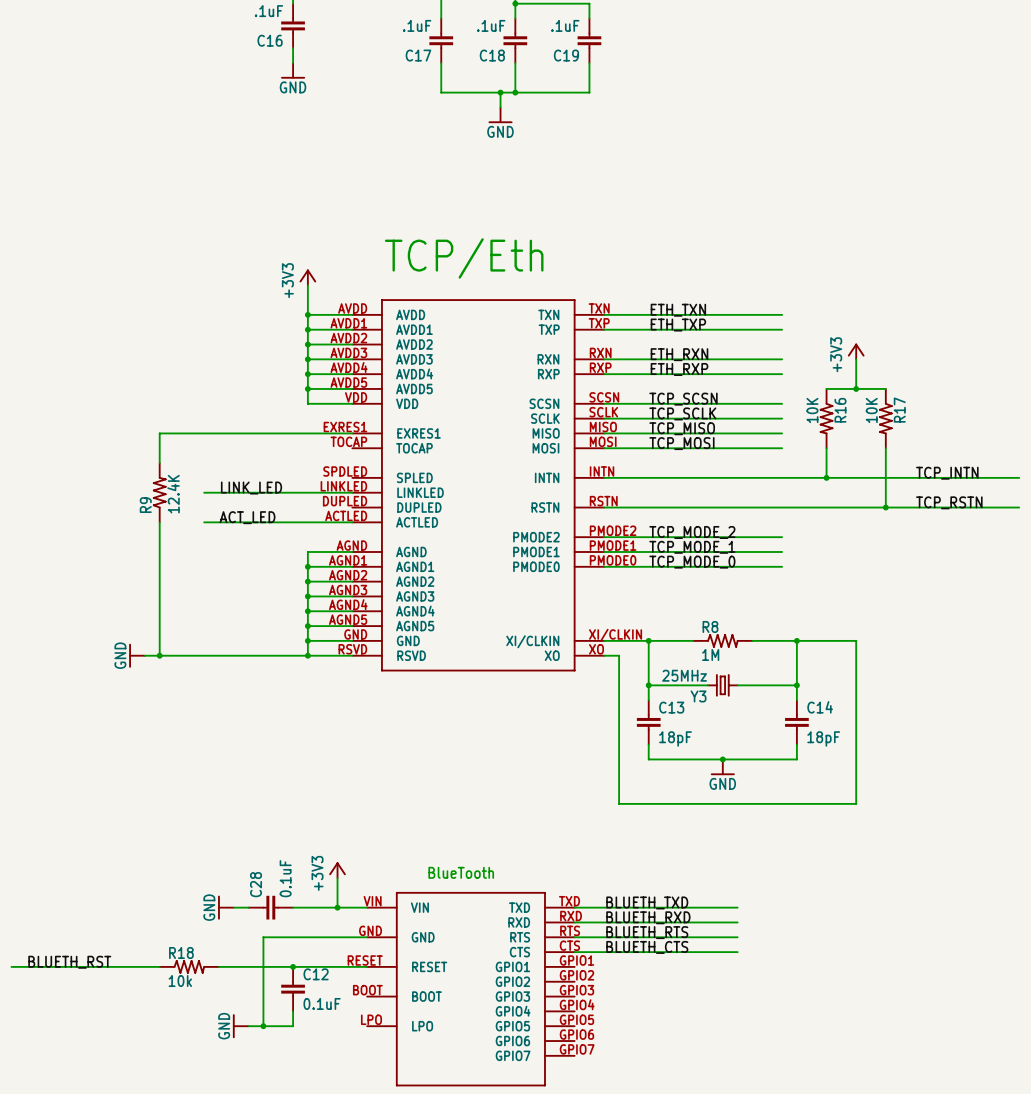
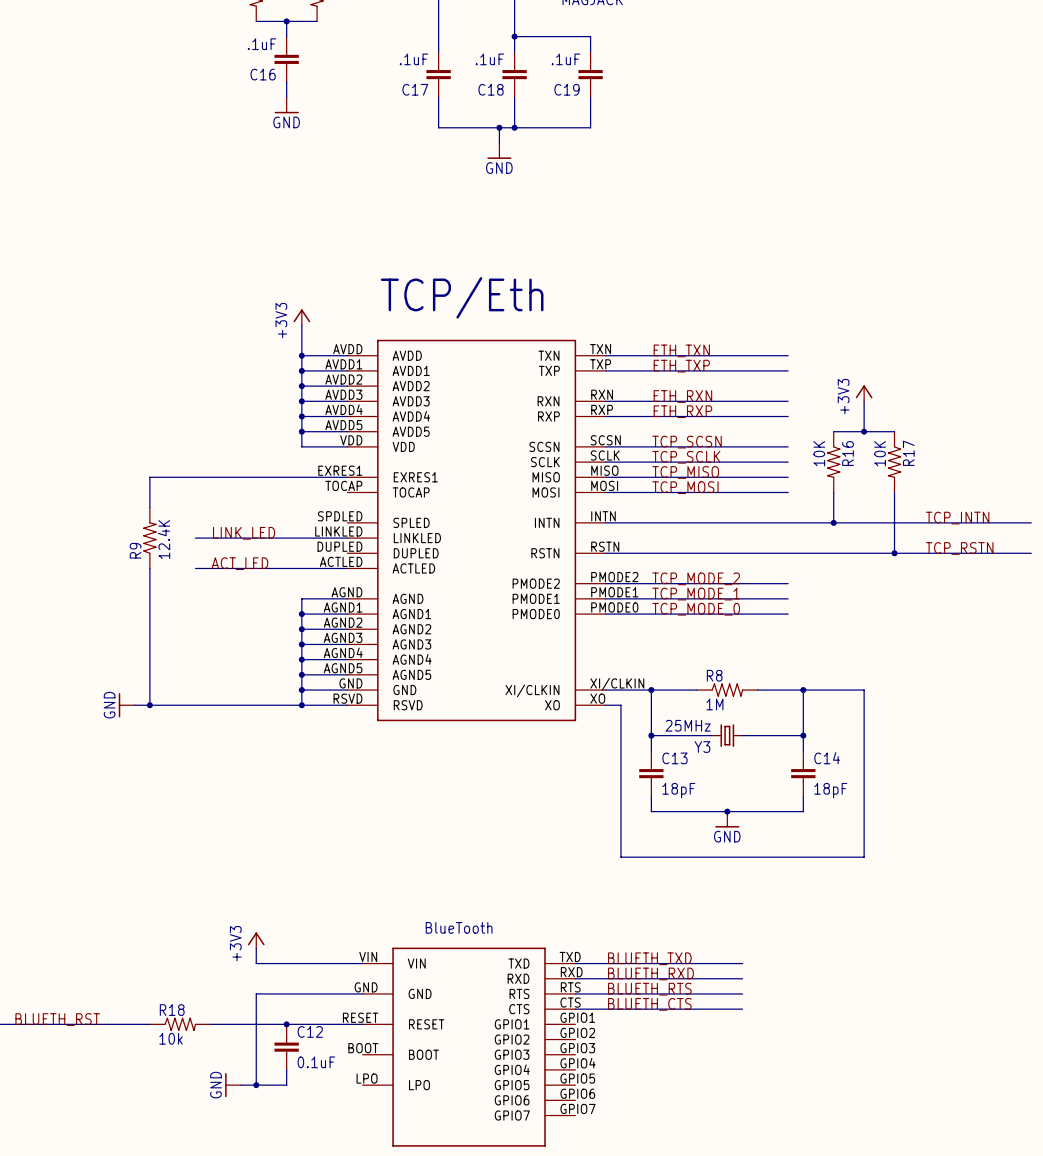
power symbol position: +3V3 (337, 870) -> +3V3 (256, 940)
wire: (337, 878) (337, 907) -> none
wire: none -> (256, 948) (256, 963) (286, 963)
power symbol: GND (226, 907) -> none
wire: (233, 907) (248, 907) -> none
C28: 0.1uF (270, 907) -> none
junction: (337, 907) -> none

